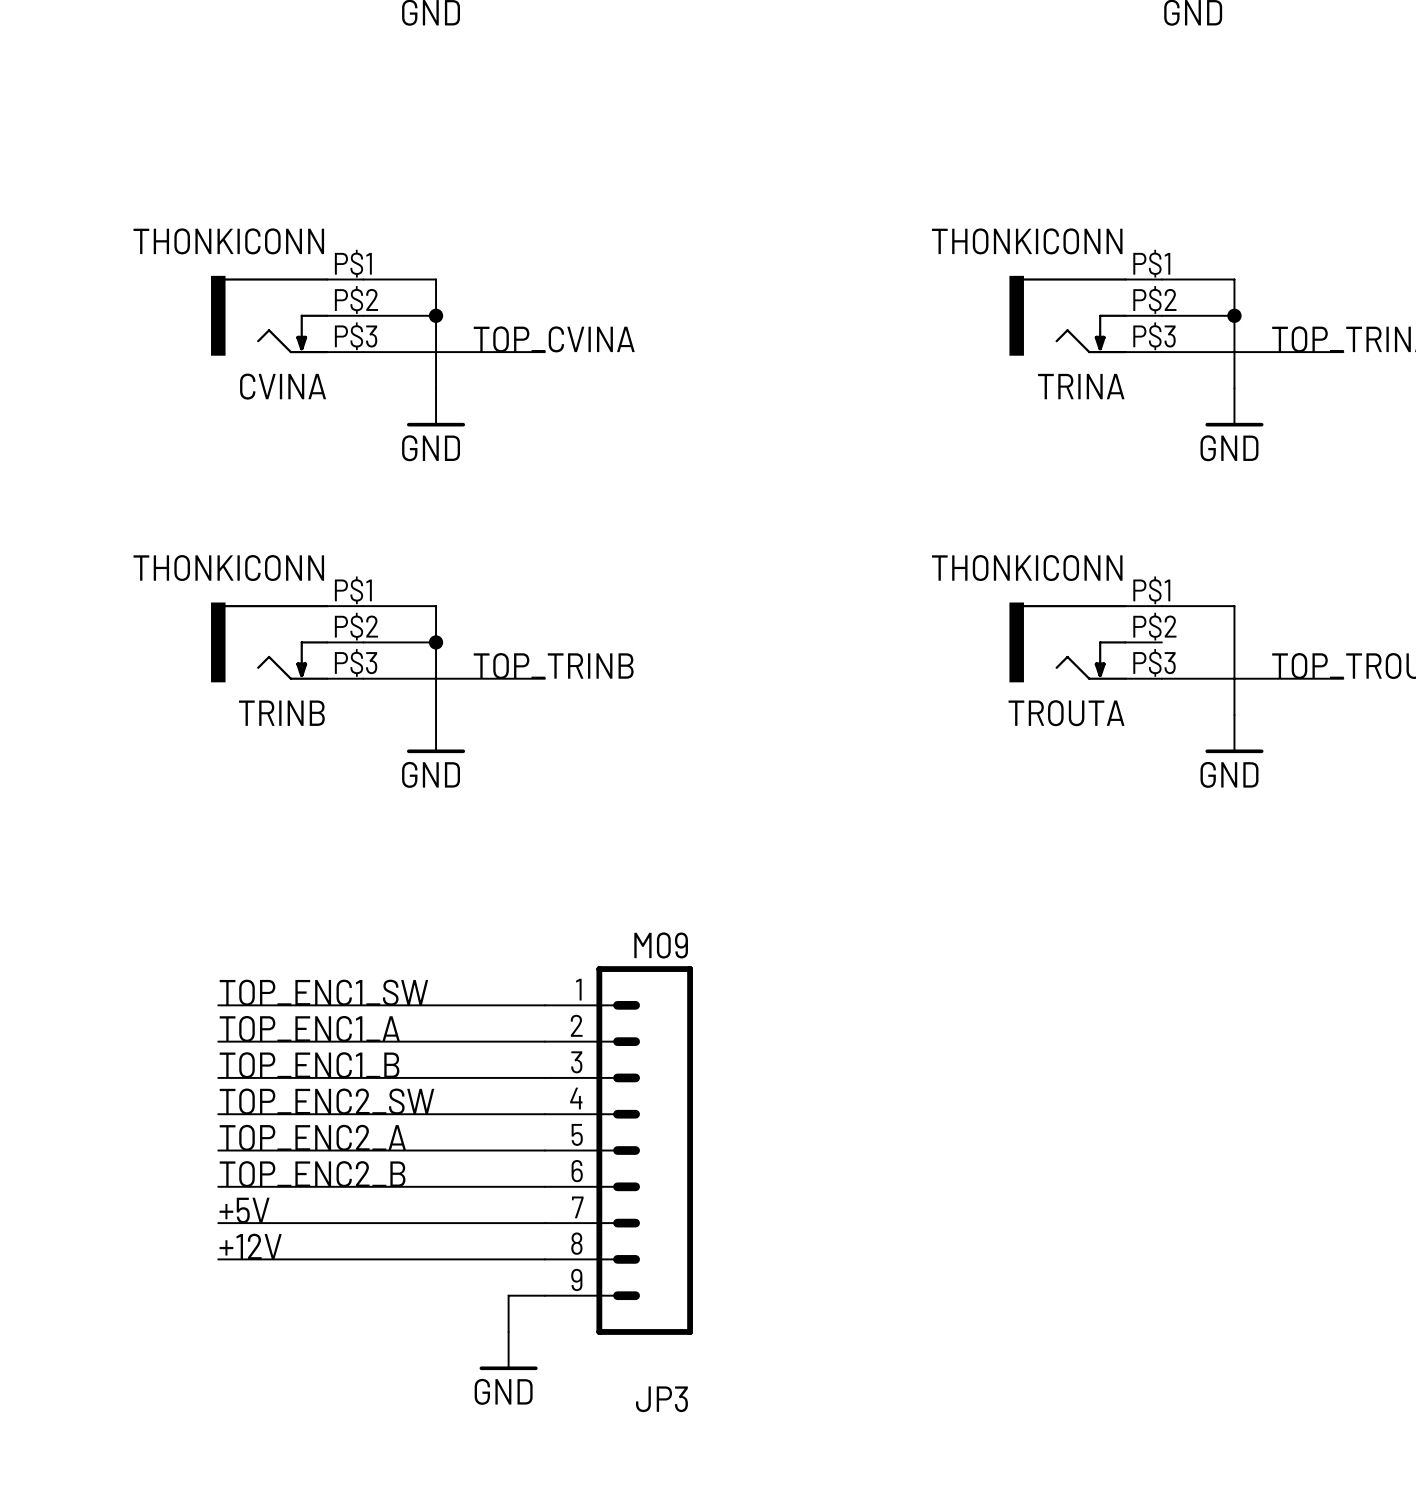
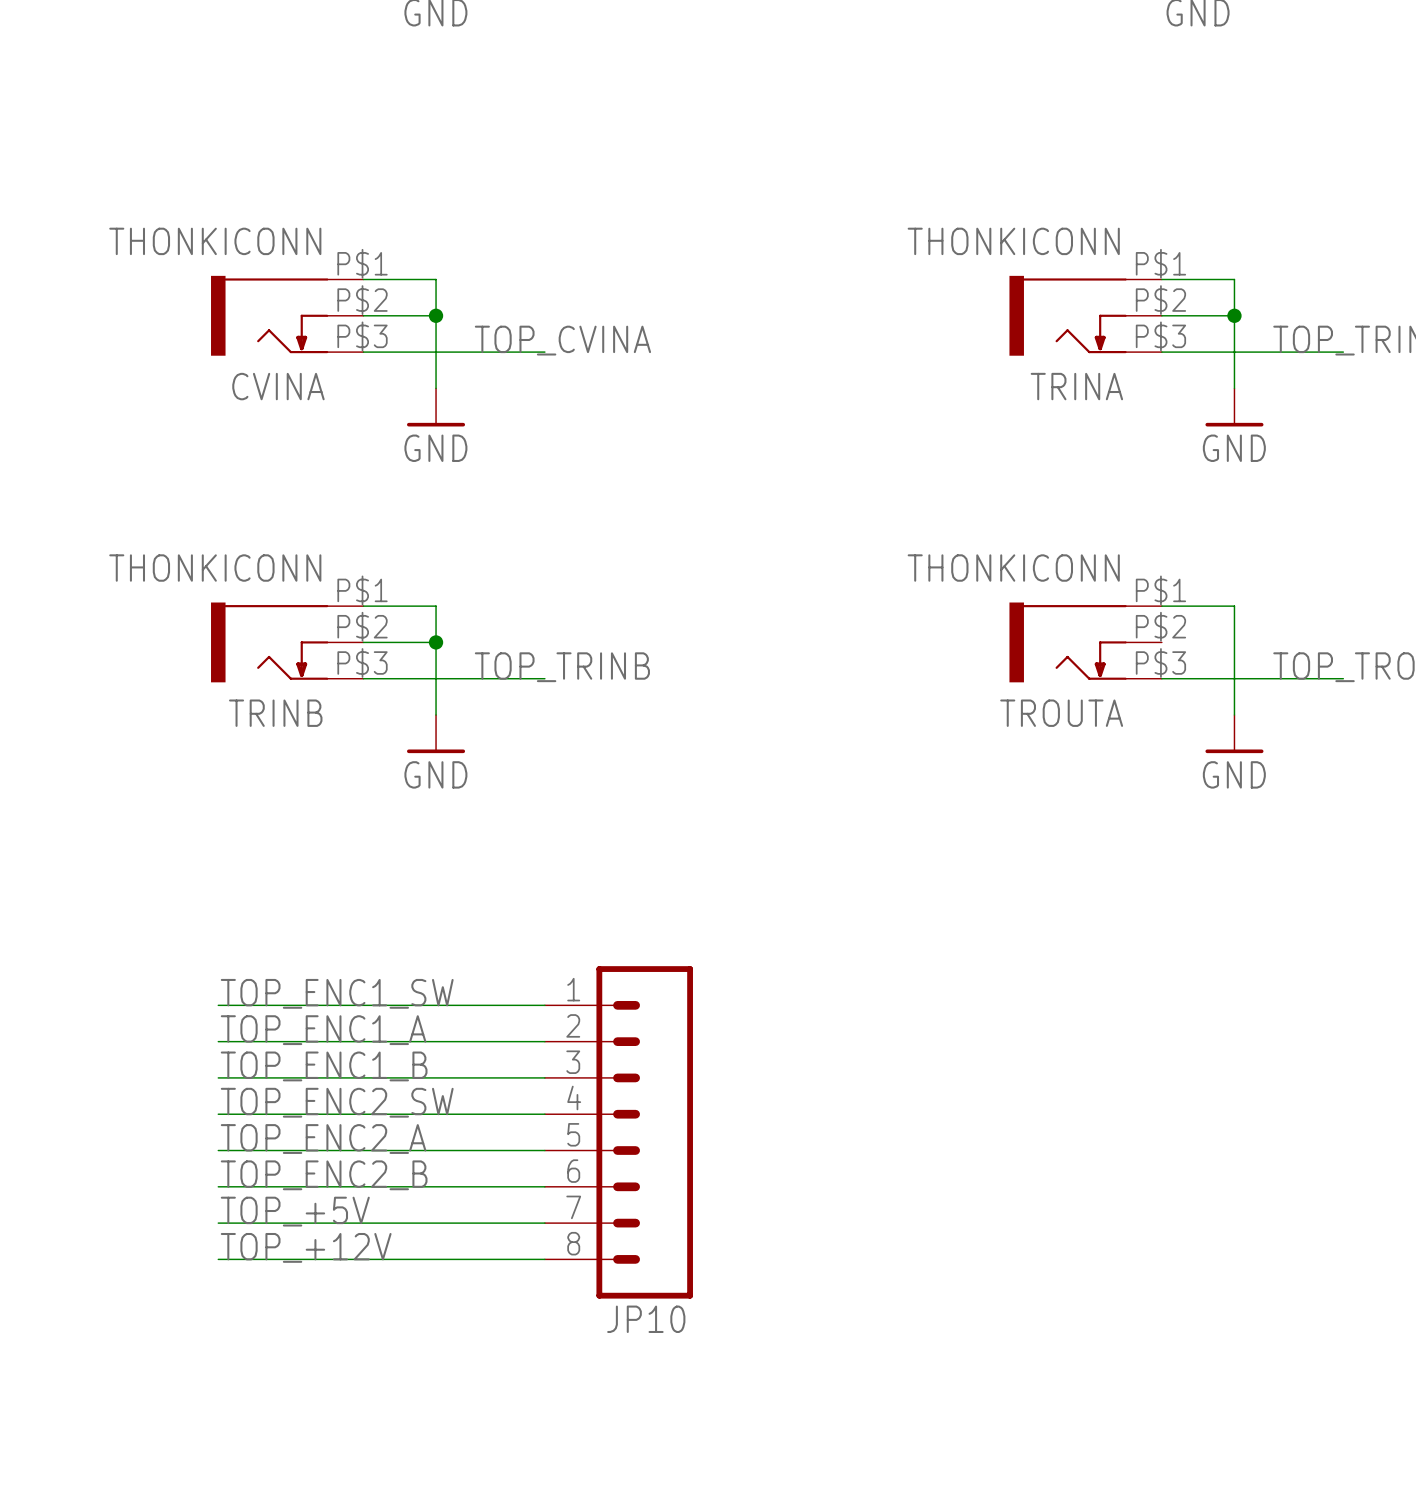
JP10: none -> (618, 1132)
JP3: M09 (618, 1150) -> none
label: +5V (244, 1210) -> TOP_+5V (295, 1211)
label: +12V (250, 1246) -> TOP_+12V (306, 1247)
wire: (544, 1295) (508, 1295) (508, 1331) -> none
power symbol: GND (508, 1351) -> none

